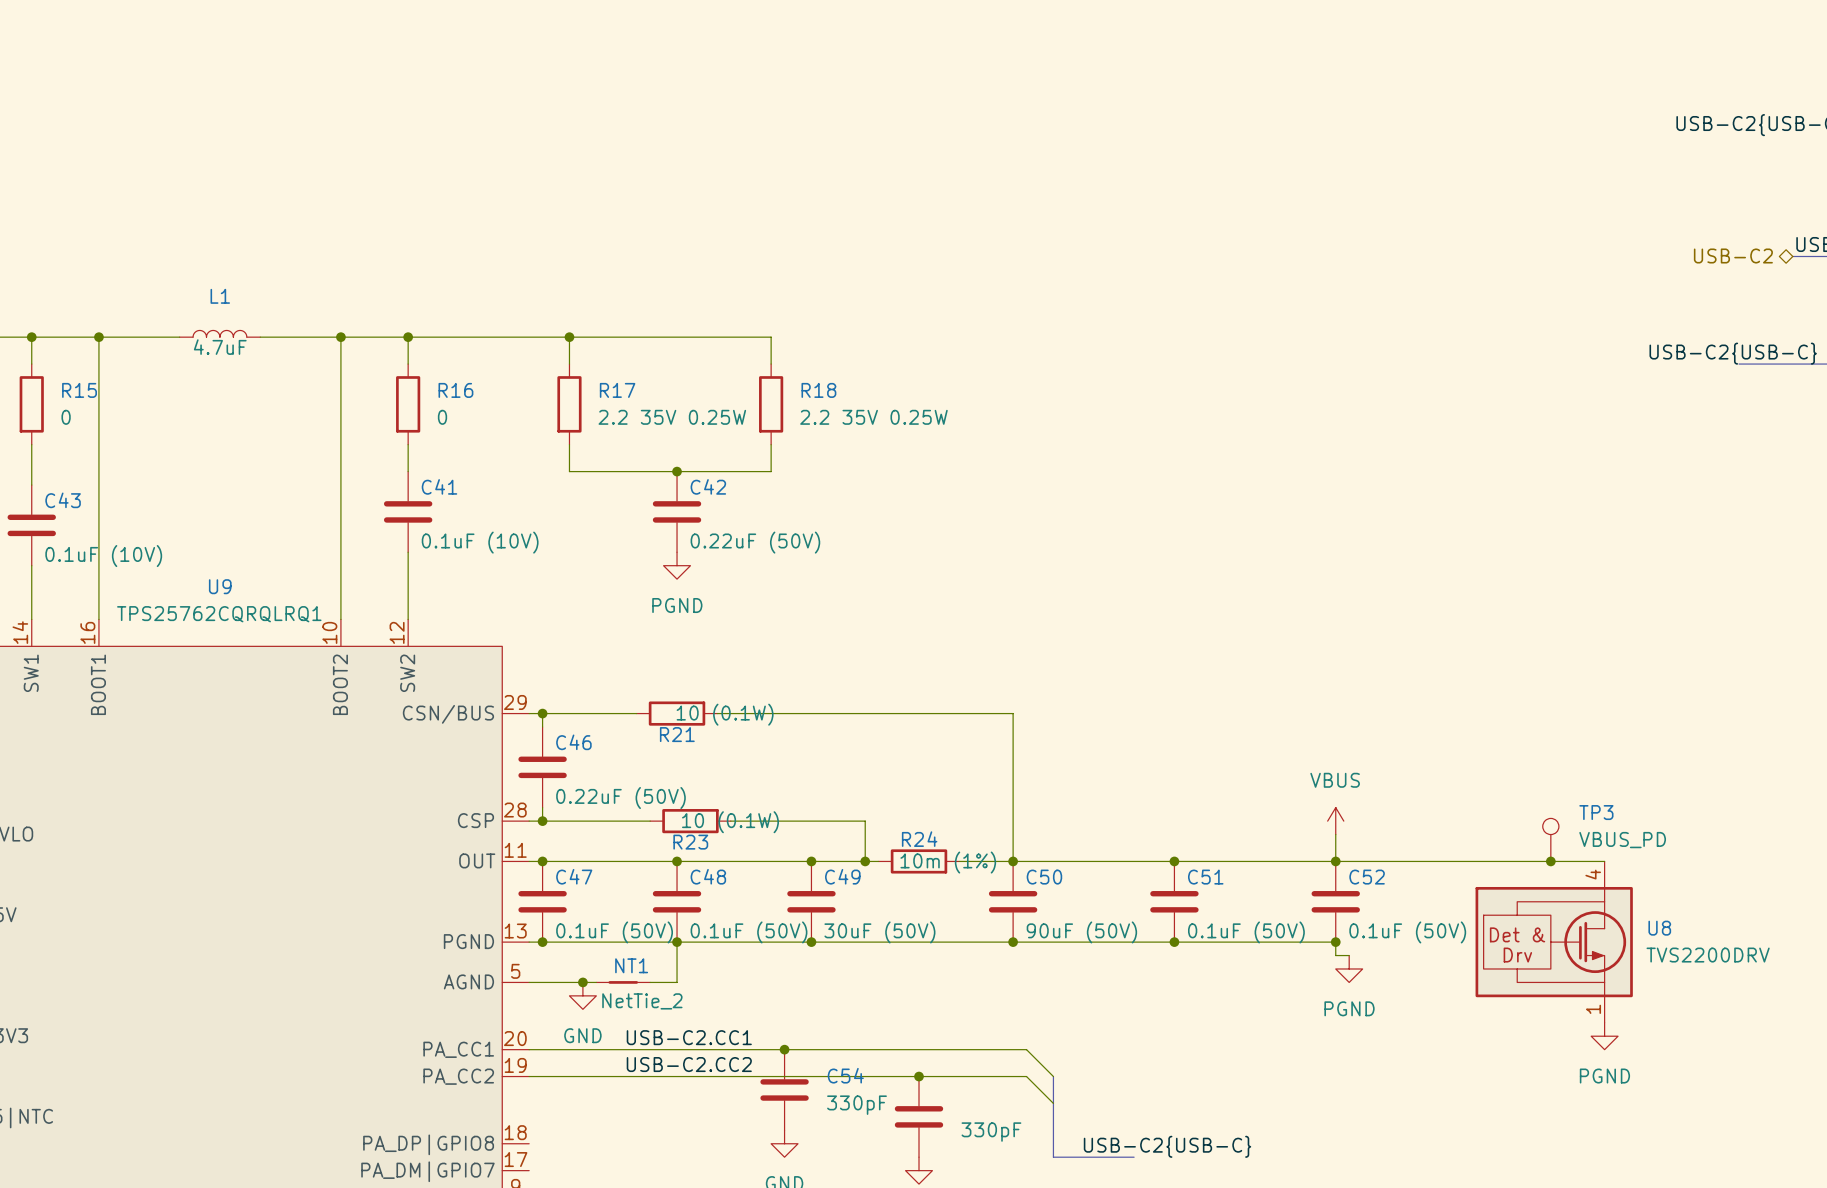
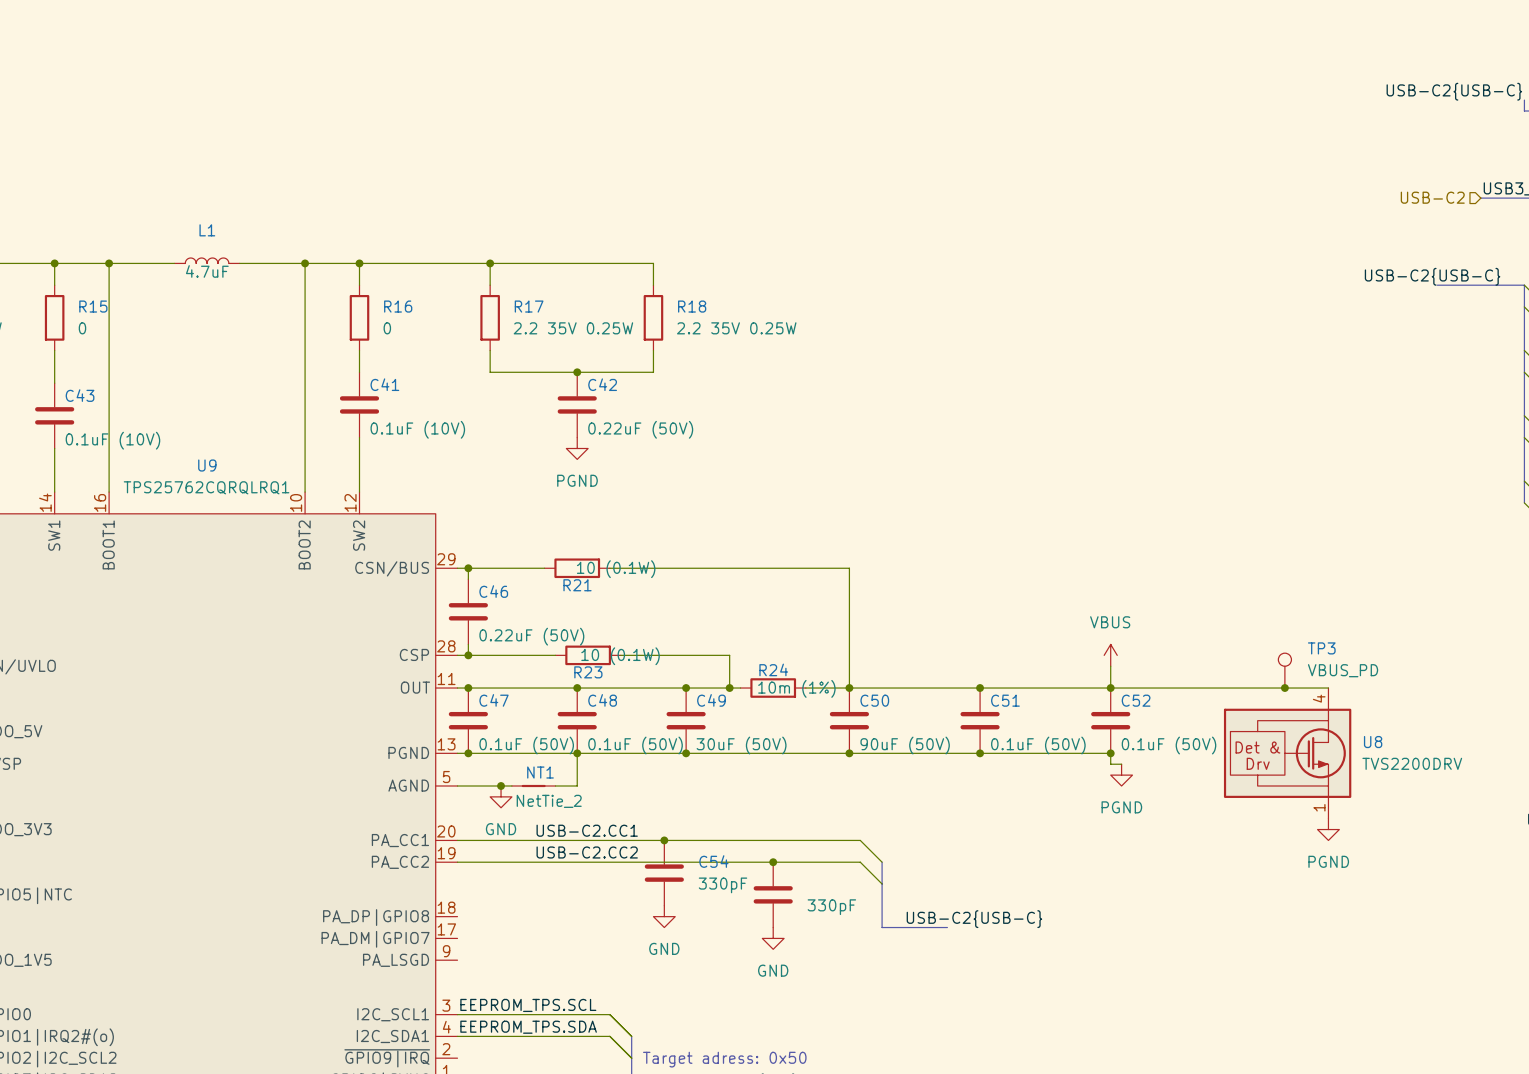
hierarchical label shape: bidirectional (1733, 255) -> input (1432, 197)

